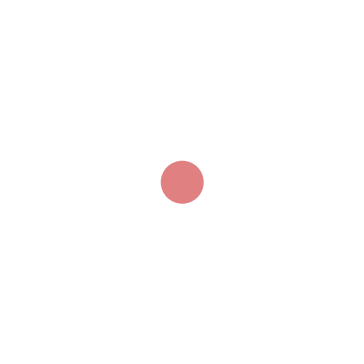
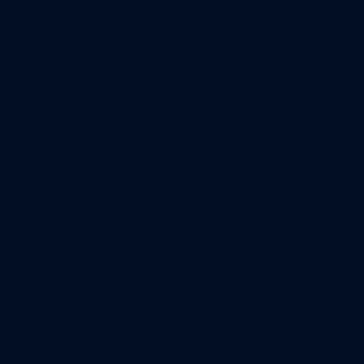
part: (182, 182) -> none

